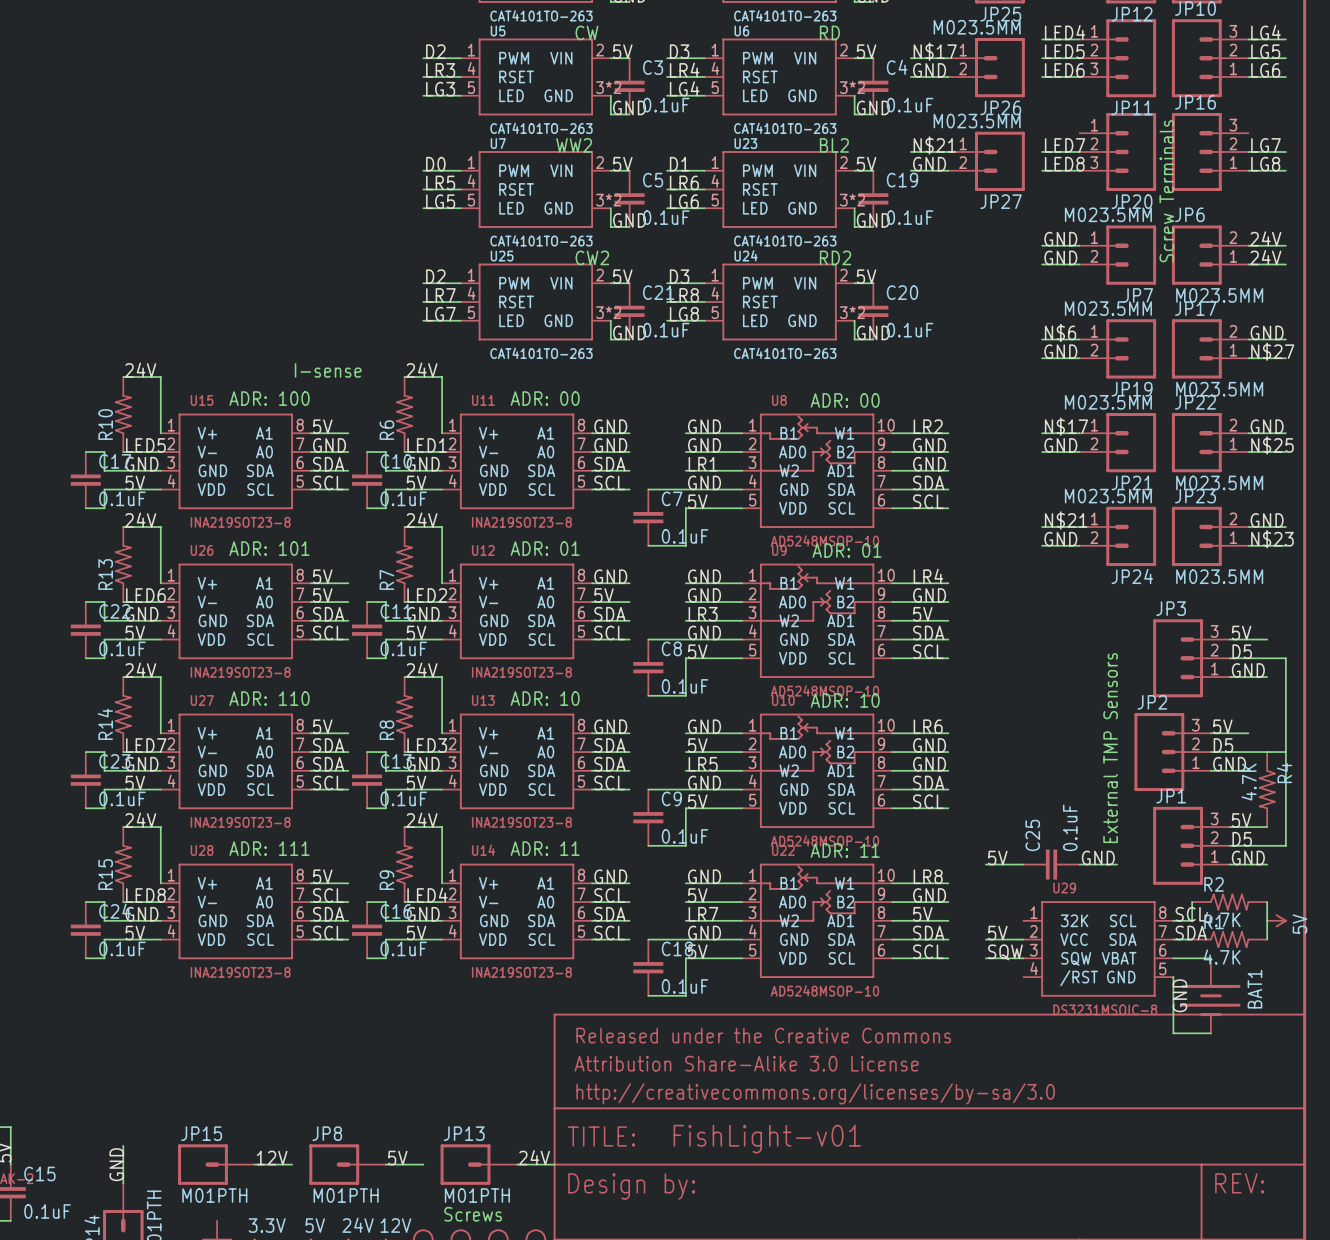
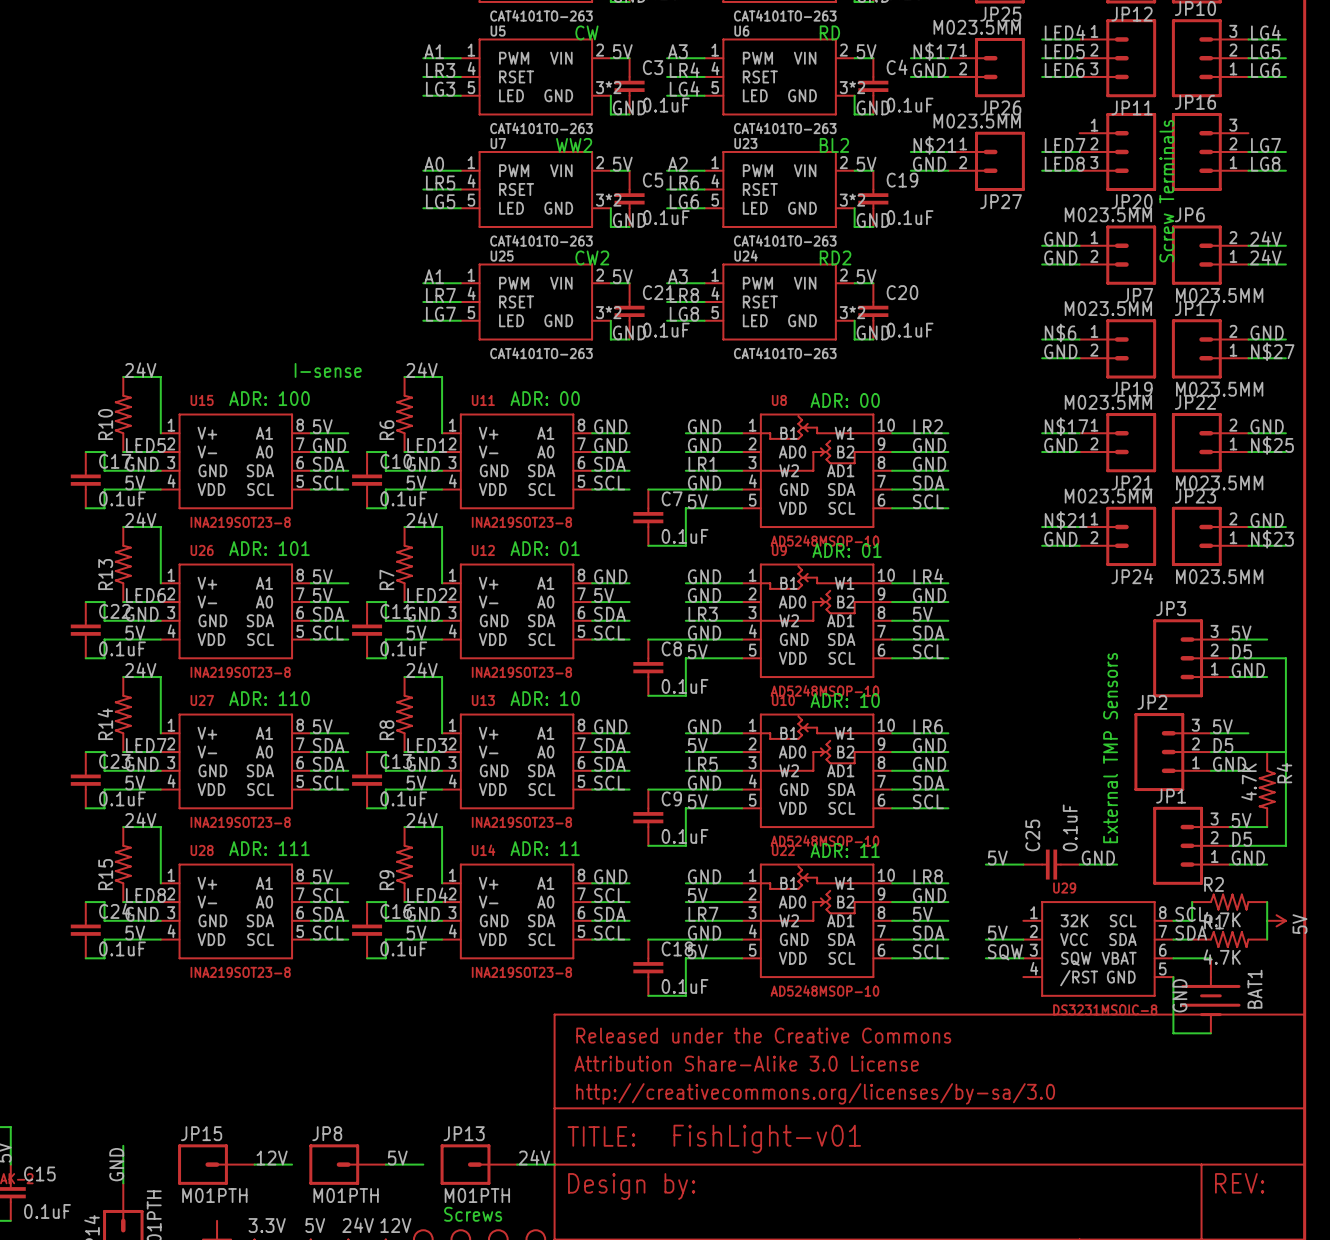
label: D2 (435, 51) -> A1 (434, 51)
label: D3 (679, 51) -> A3 (677, 51)
label: D0 (435, 164) -> A0 (434, 164)
label: D1 (679, 164) -> A2 (677, 164)
label: D2 (435, 276) -> A1 (434, 276)
label: D3 (679, 276) -> A3 (677, 276)

